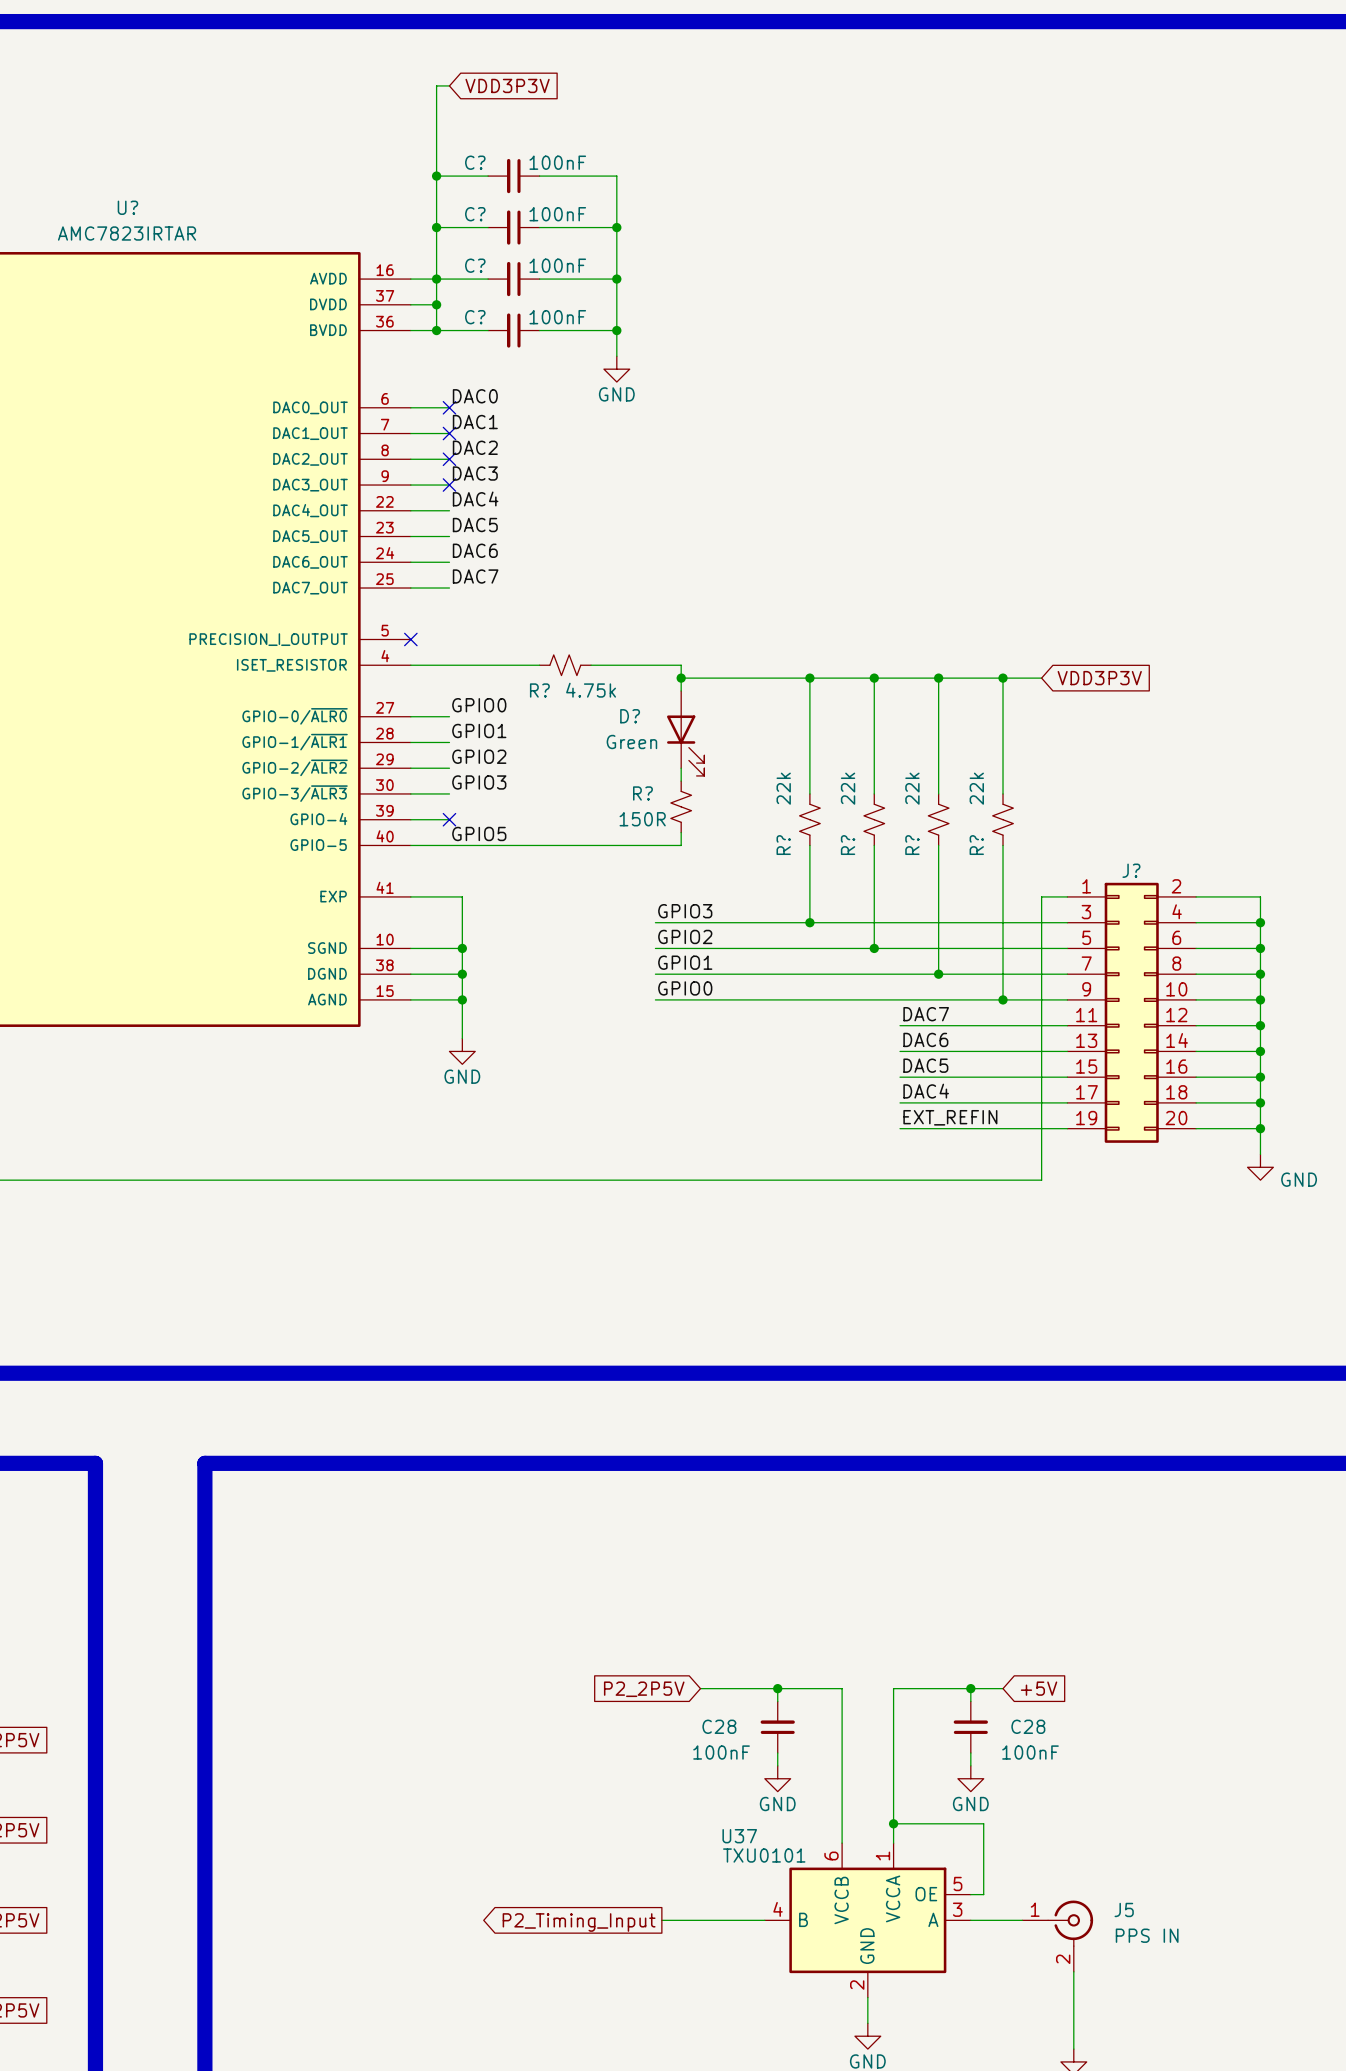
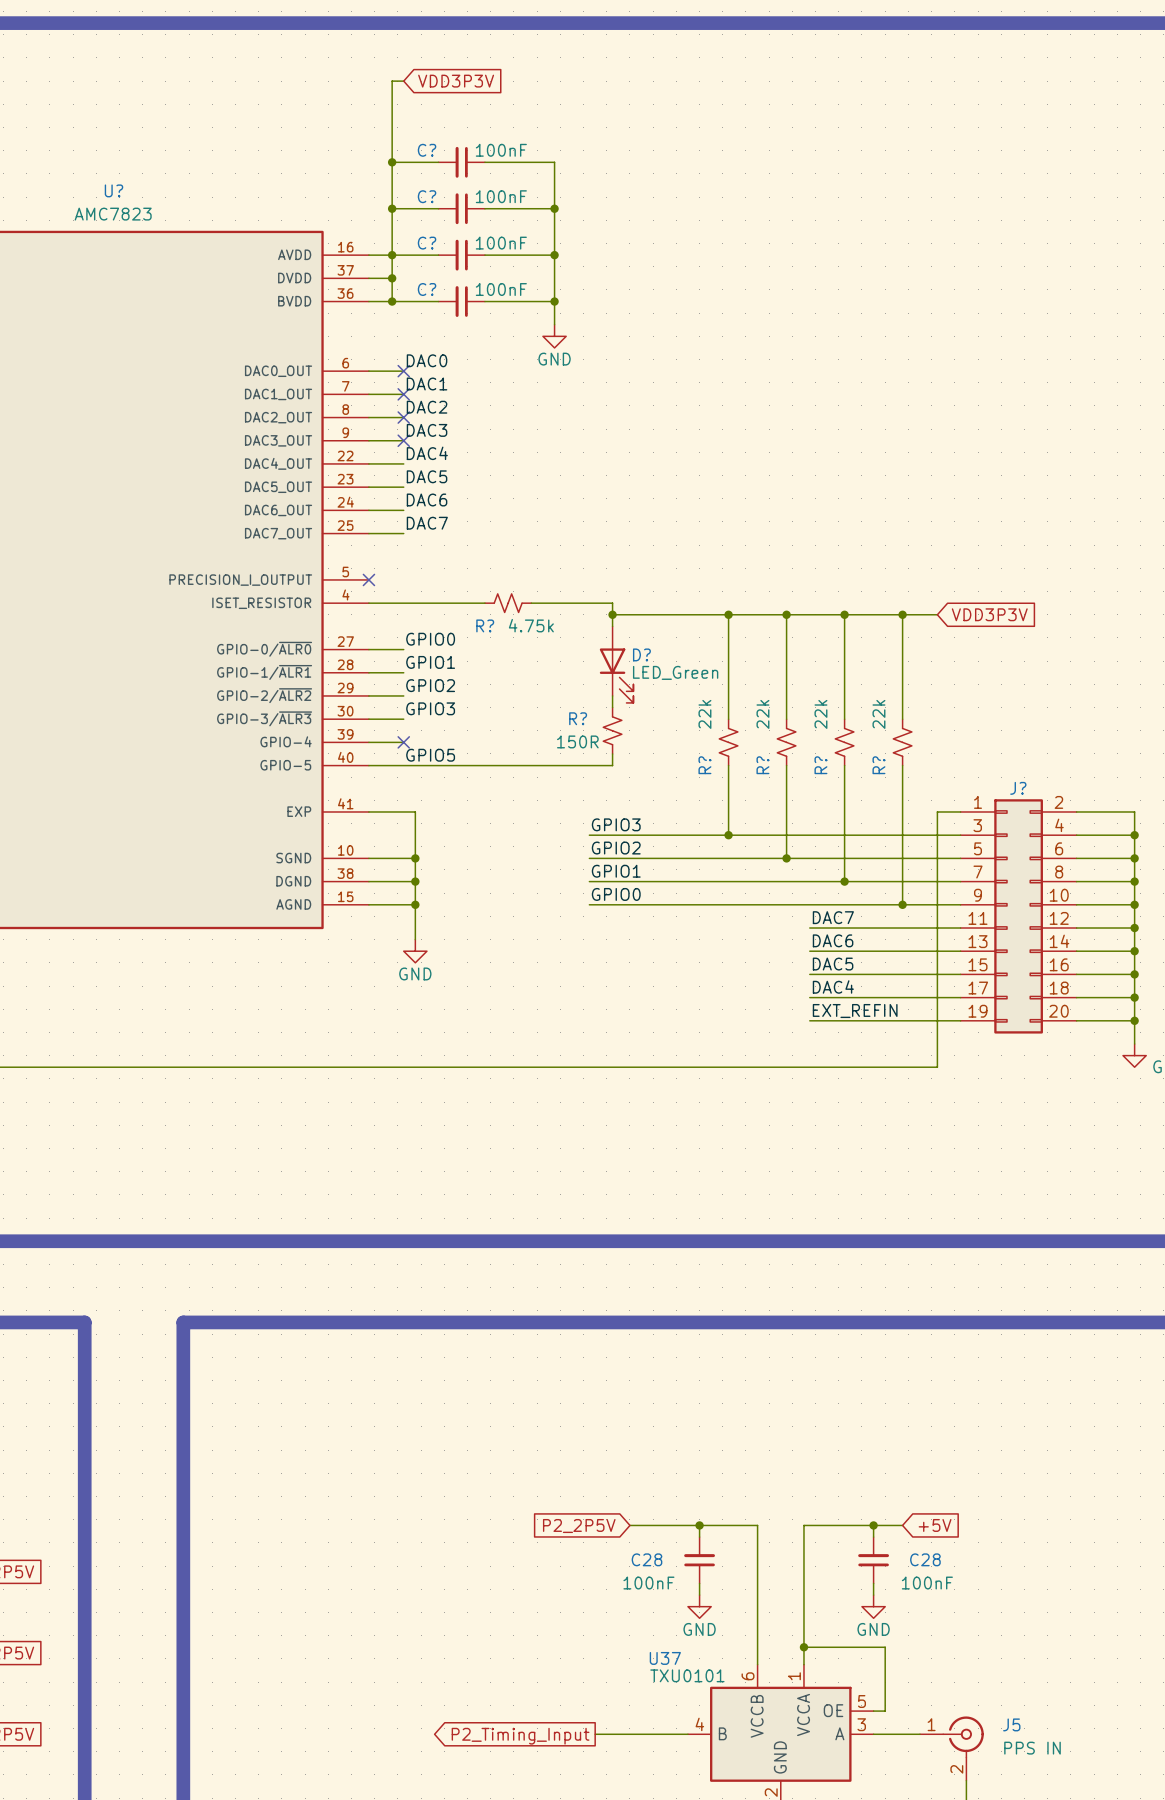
U? value: AMC7823IRTAR (127, 233) -> AMC7823 (113, 214)
D? name position: D? (630, 716) -> D? (641, 654)
D? value: Green (631, 741) -> LED_Green (675, 672)

